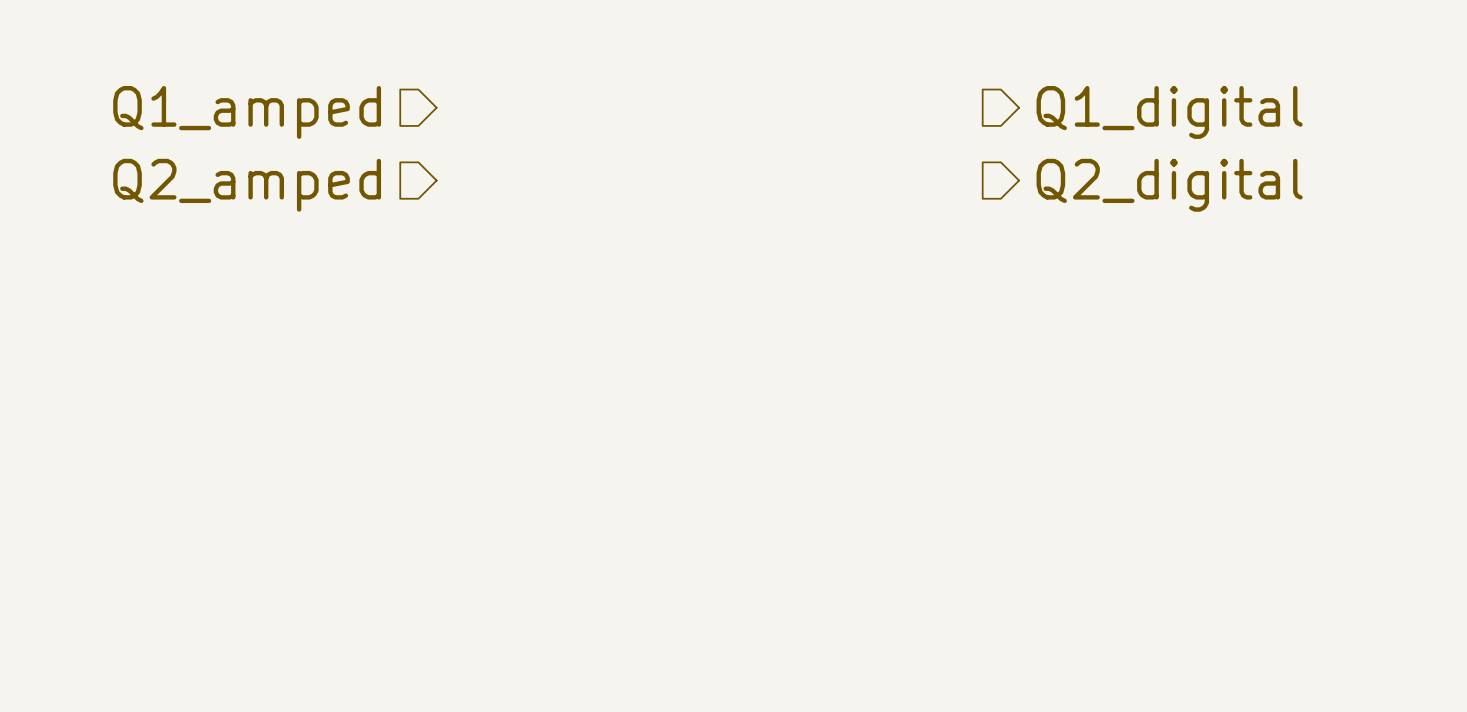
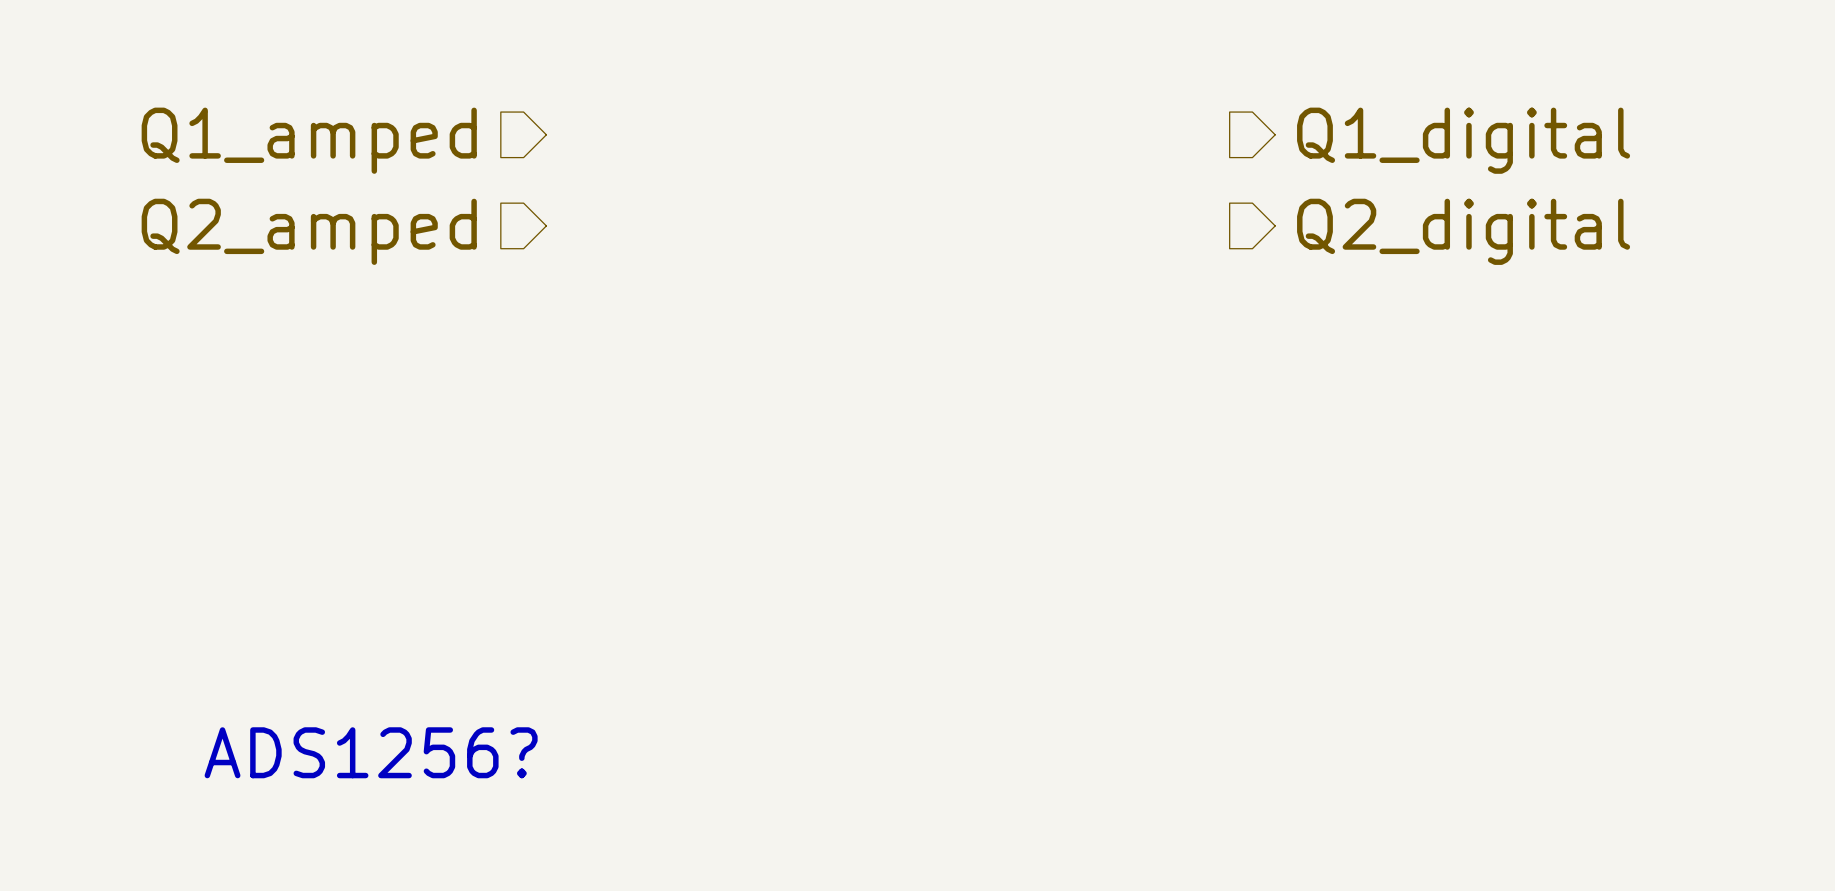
text: none -> ADS1256? (371, 752)

